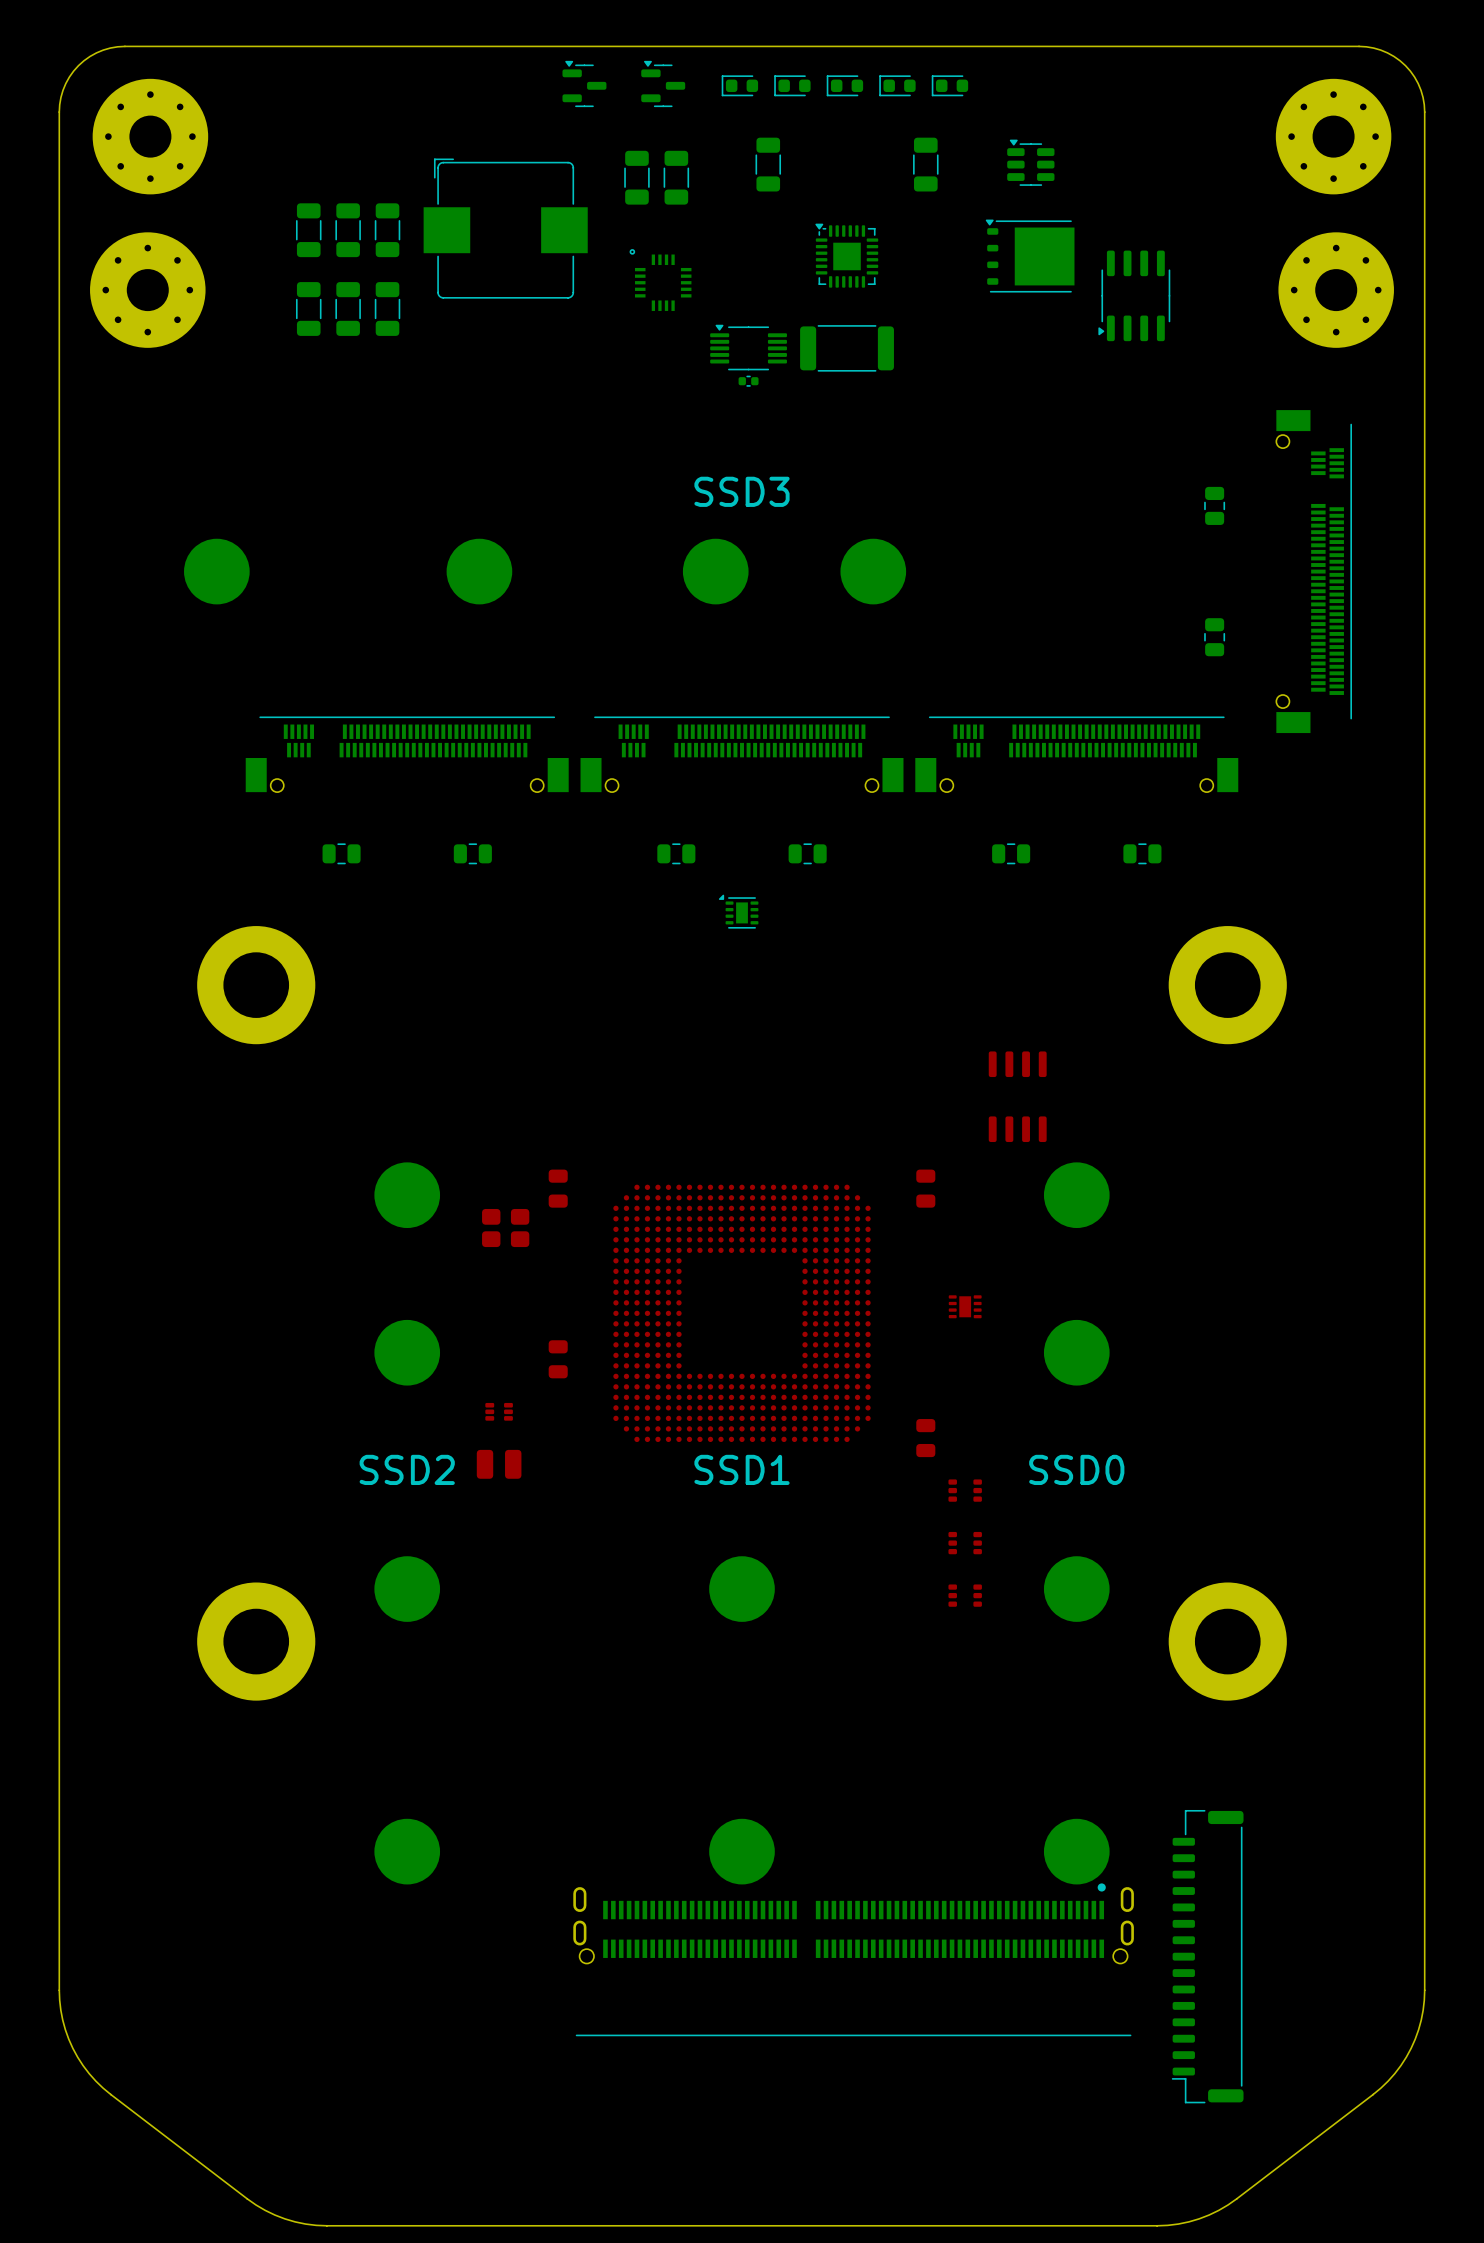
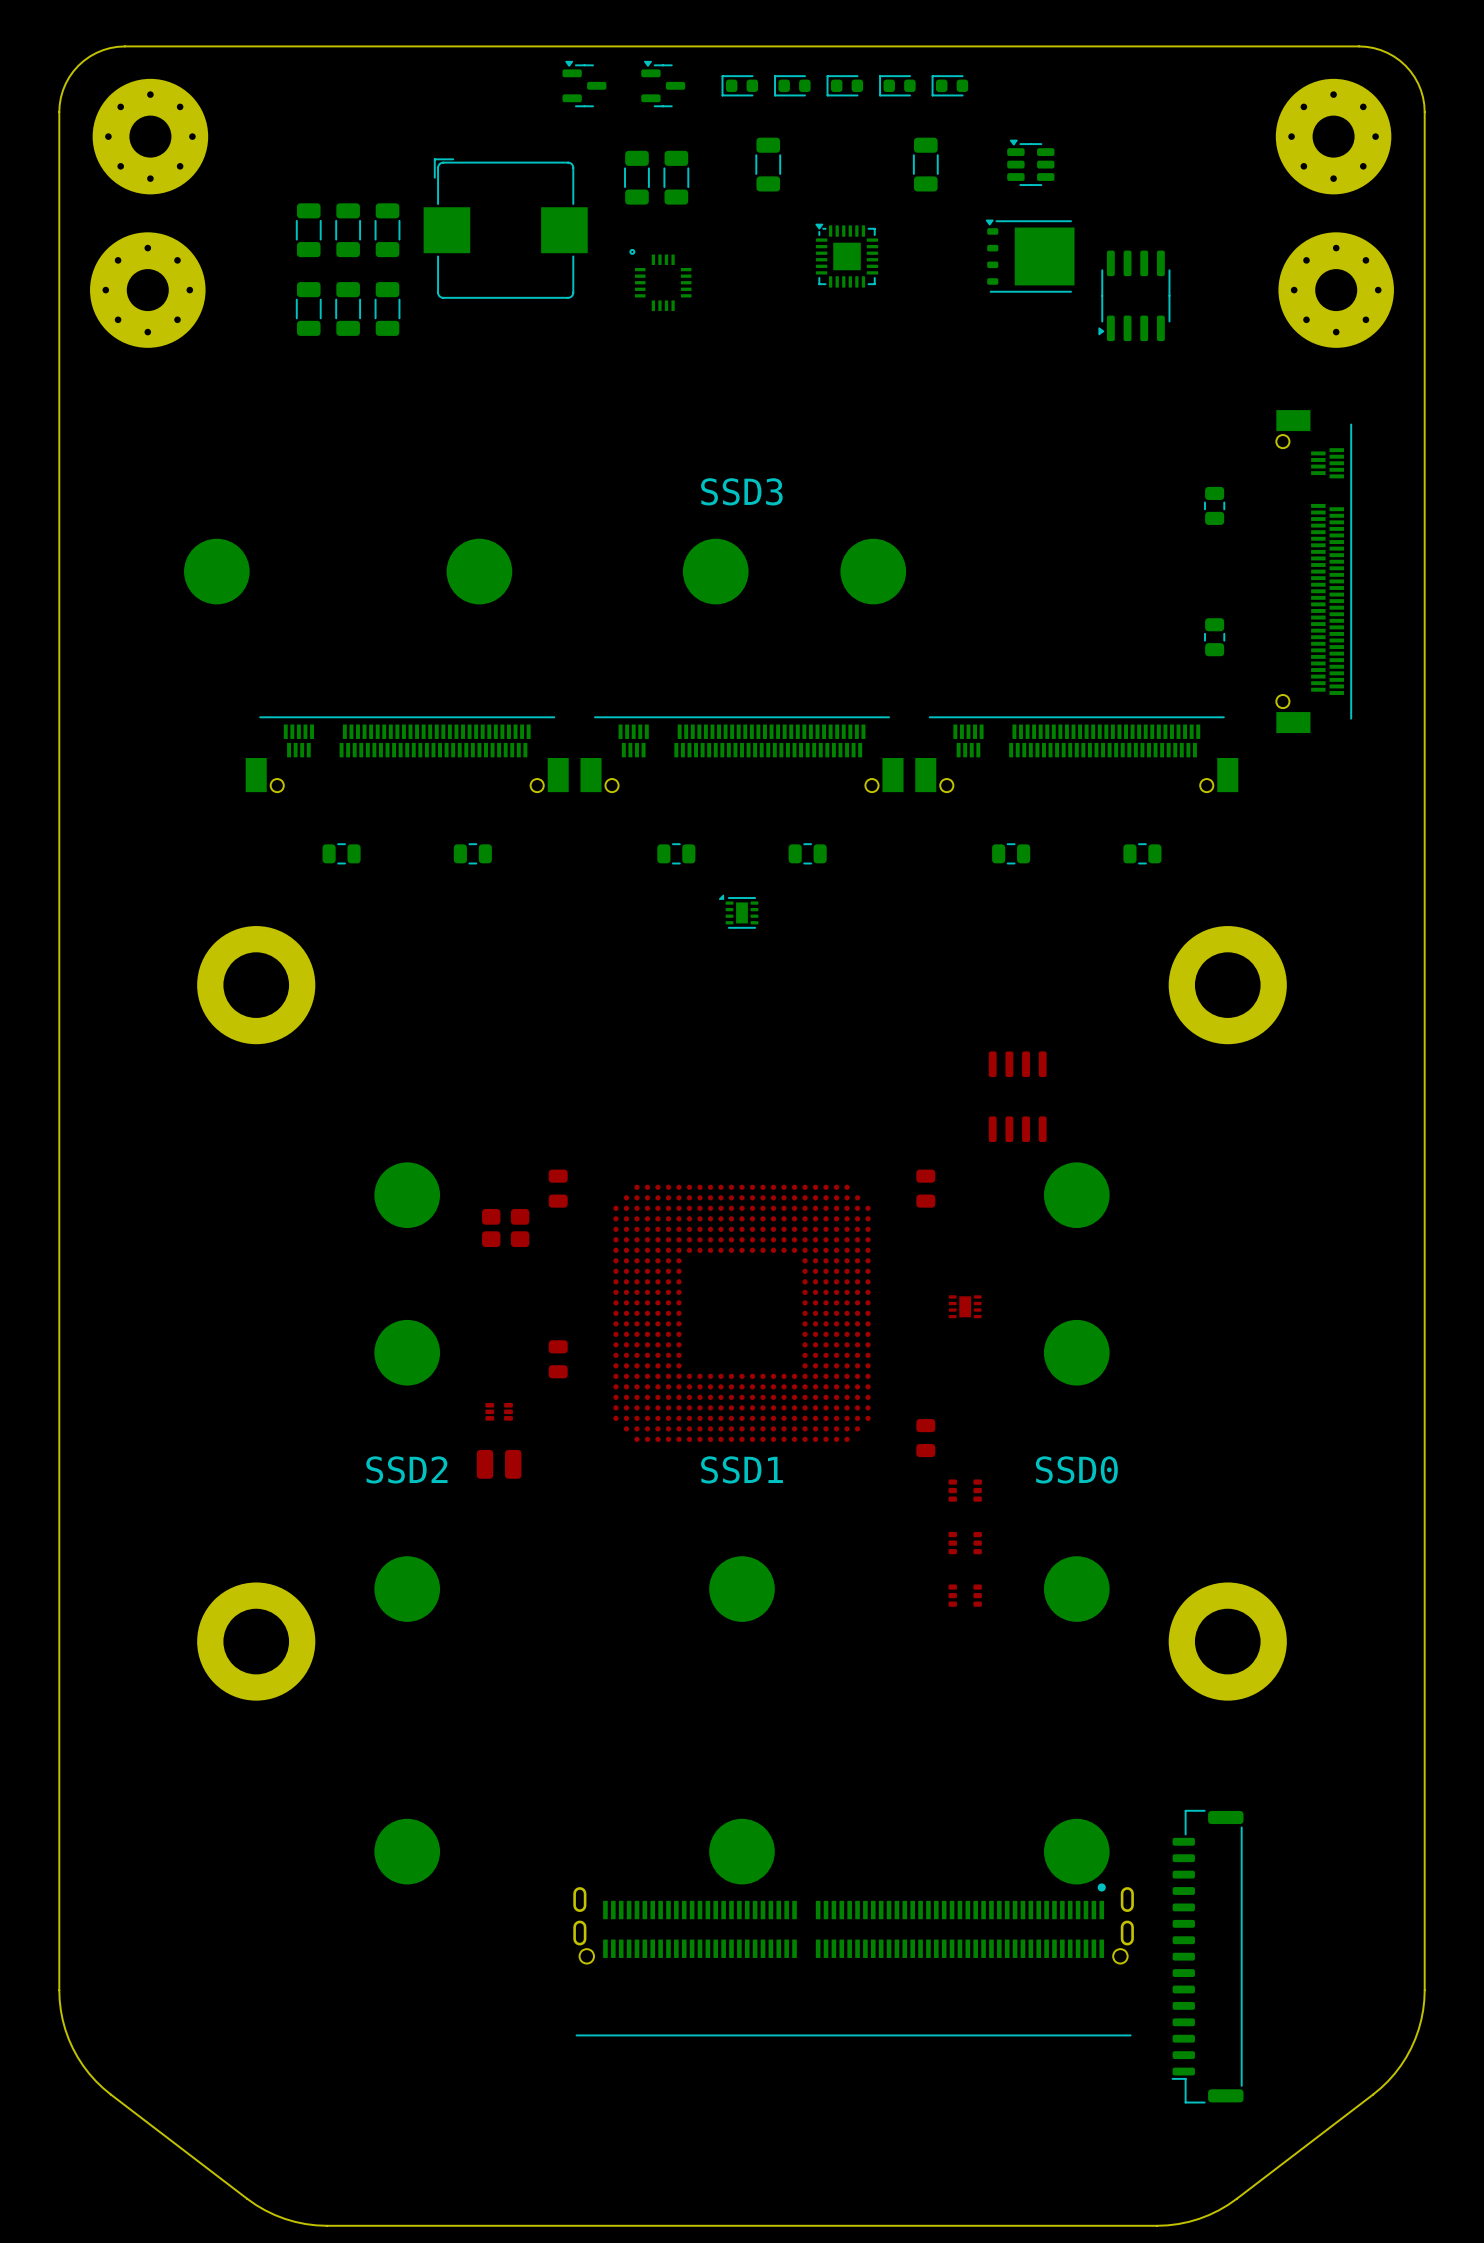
part: (748, 347) -> none
part: (847, 348) -> none
part: (748, 381) -> none

